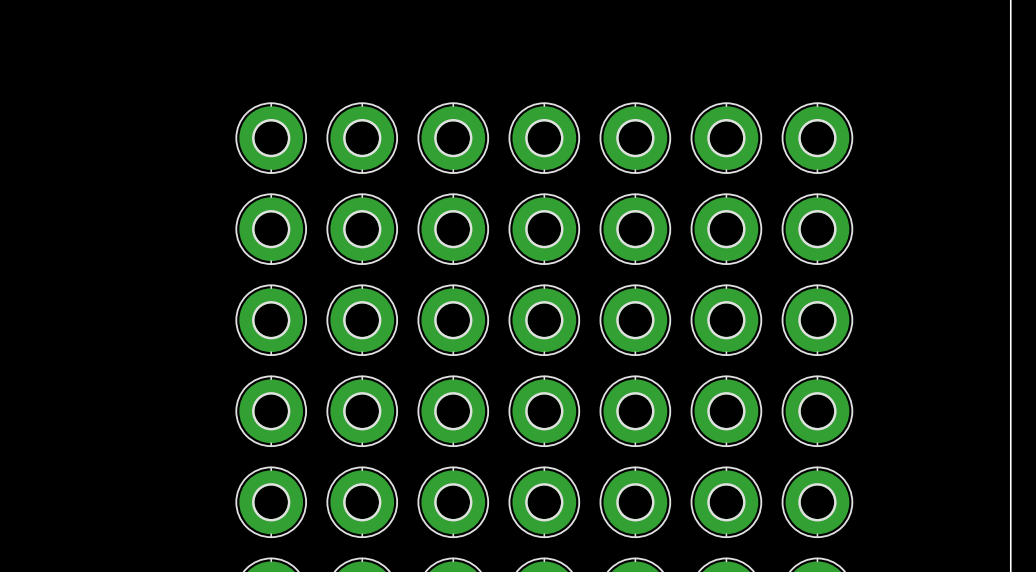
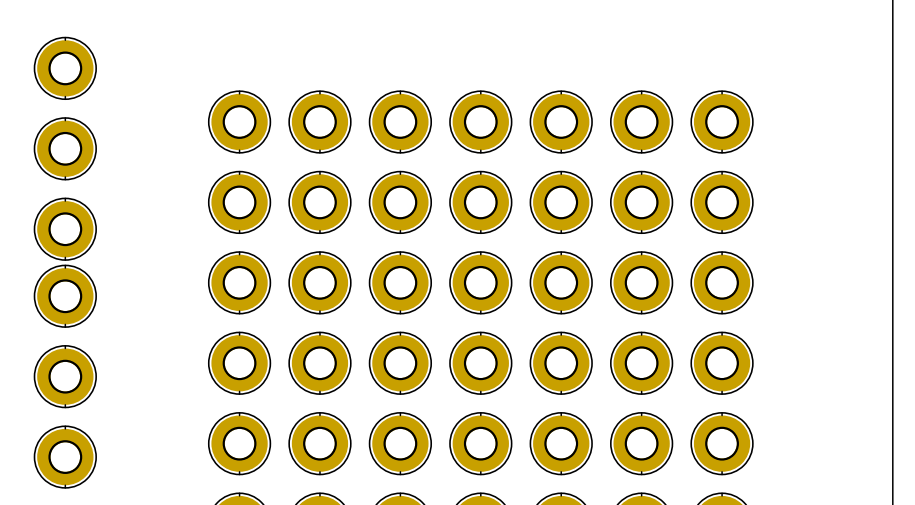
part: none -> (65, 68)
part: none -> (65, 148)
part: none -> (65, 229)
part: none -> (65, 296)
part: none -> (65, 376)
part: none -> (65, 457)

